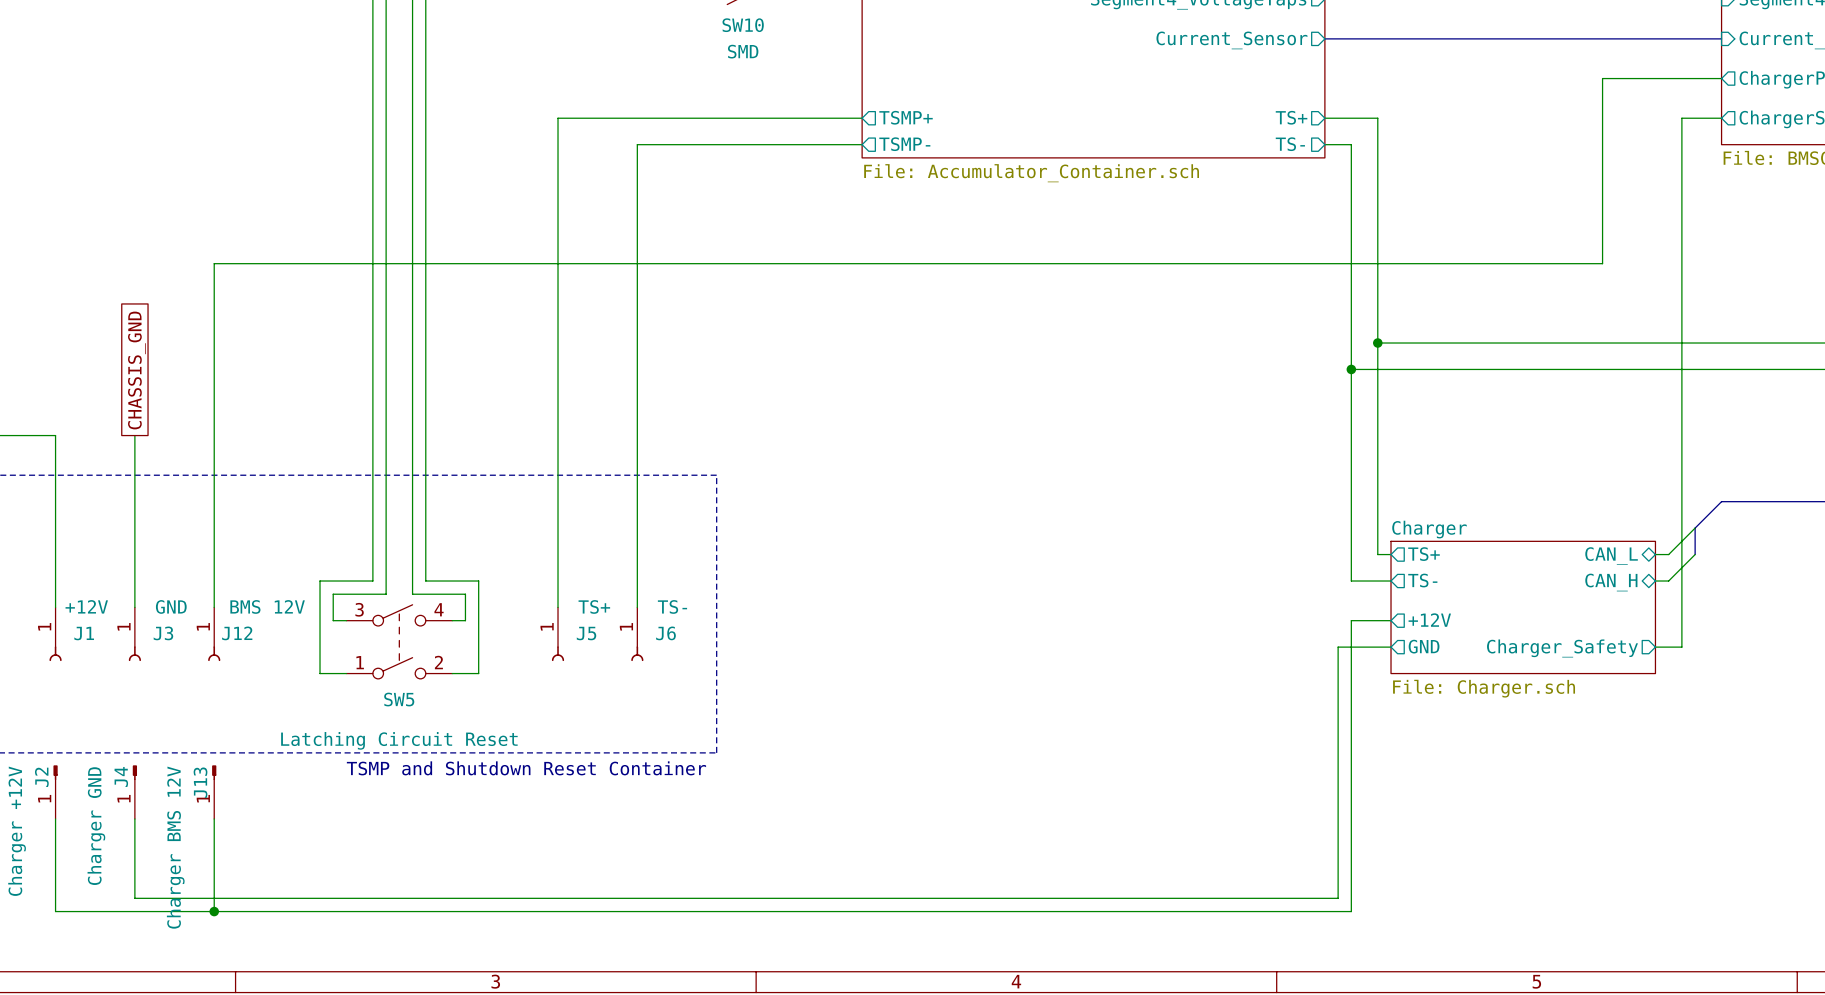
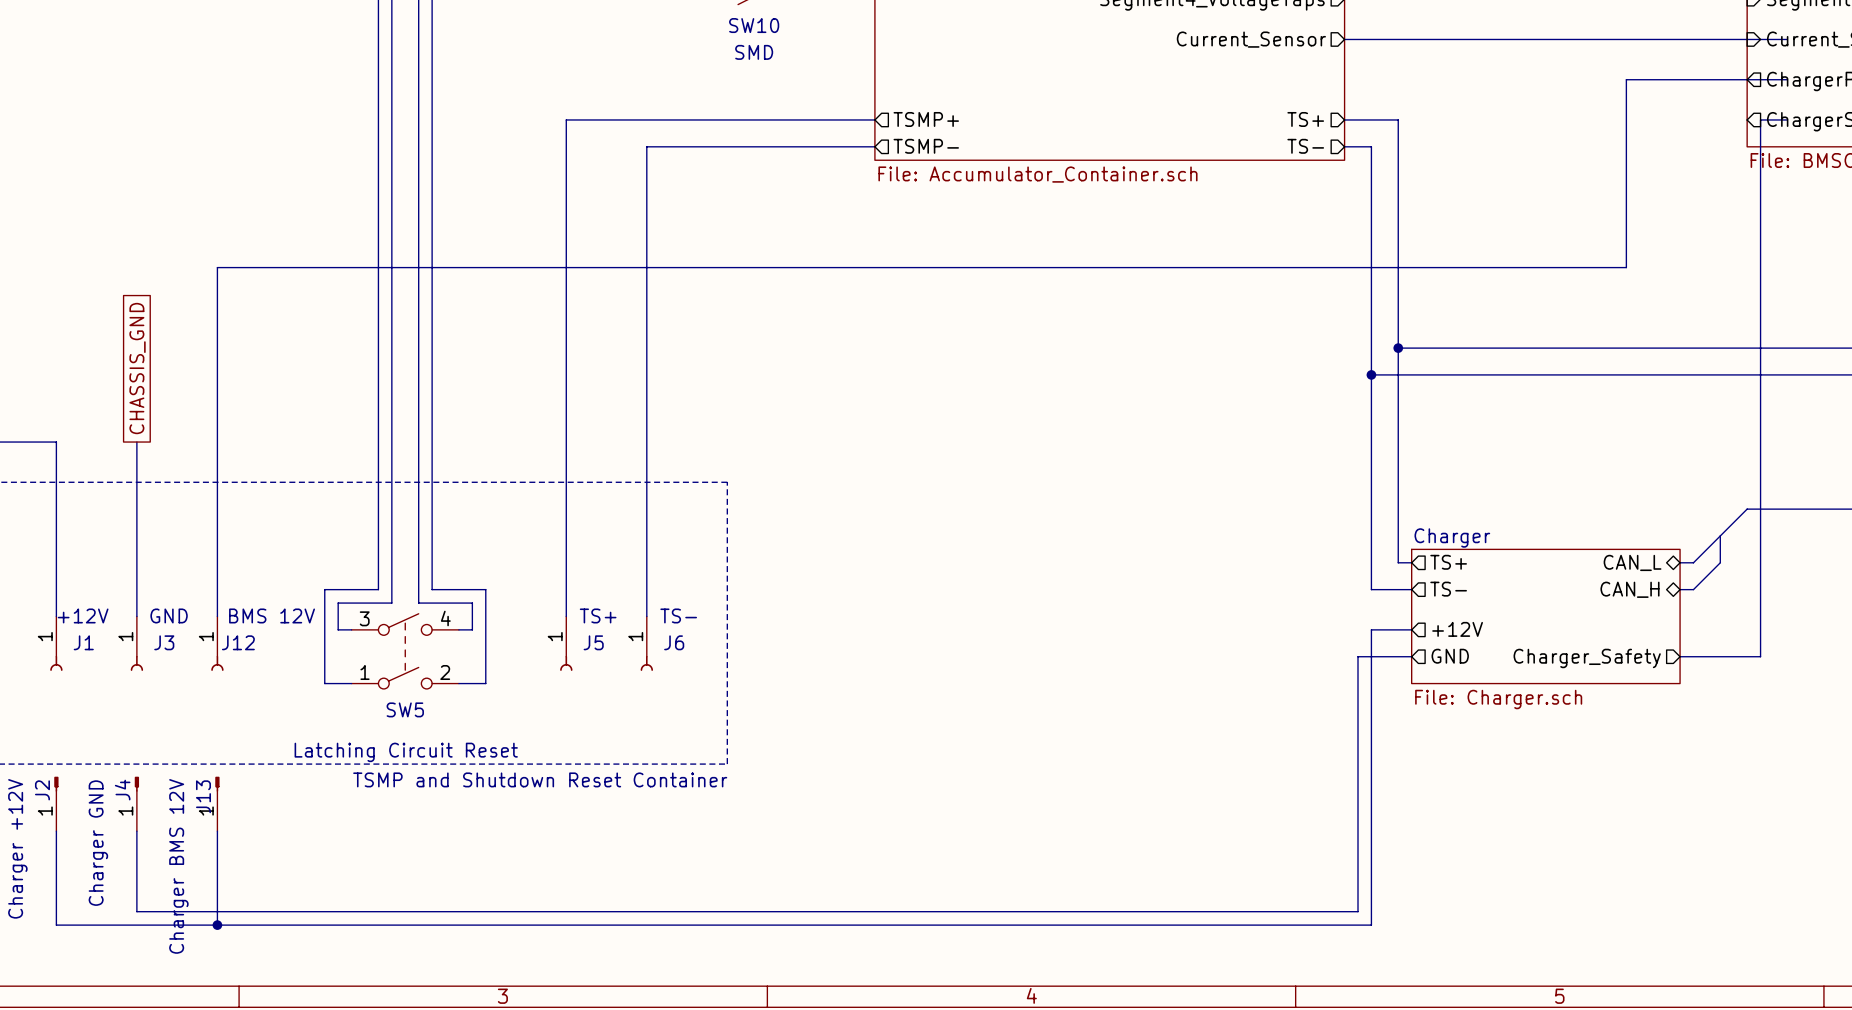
bus: none -> (1747, 39) (1787, 39)
wire: none -> (1747, 79) (1787, 79)
wire: (1721, 118) (1681, 118) (1681, 647) -> (1787, 119) (1760, 119) (1760, 656) (1706, 656)

